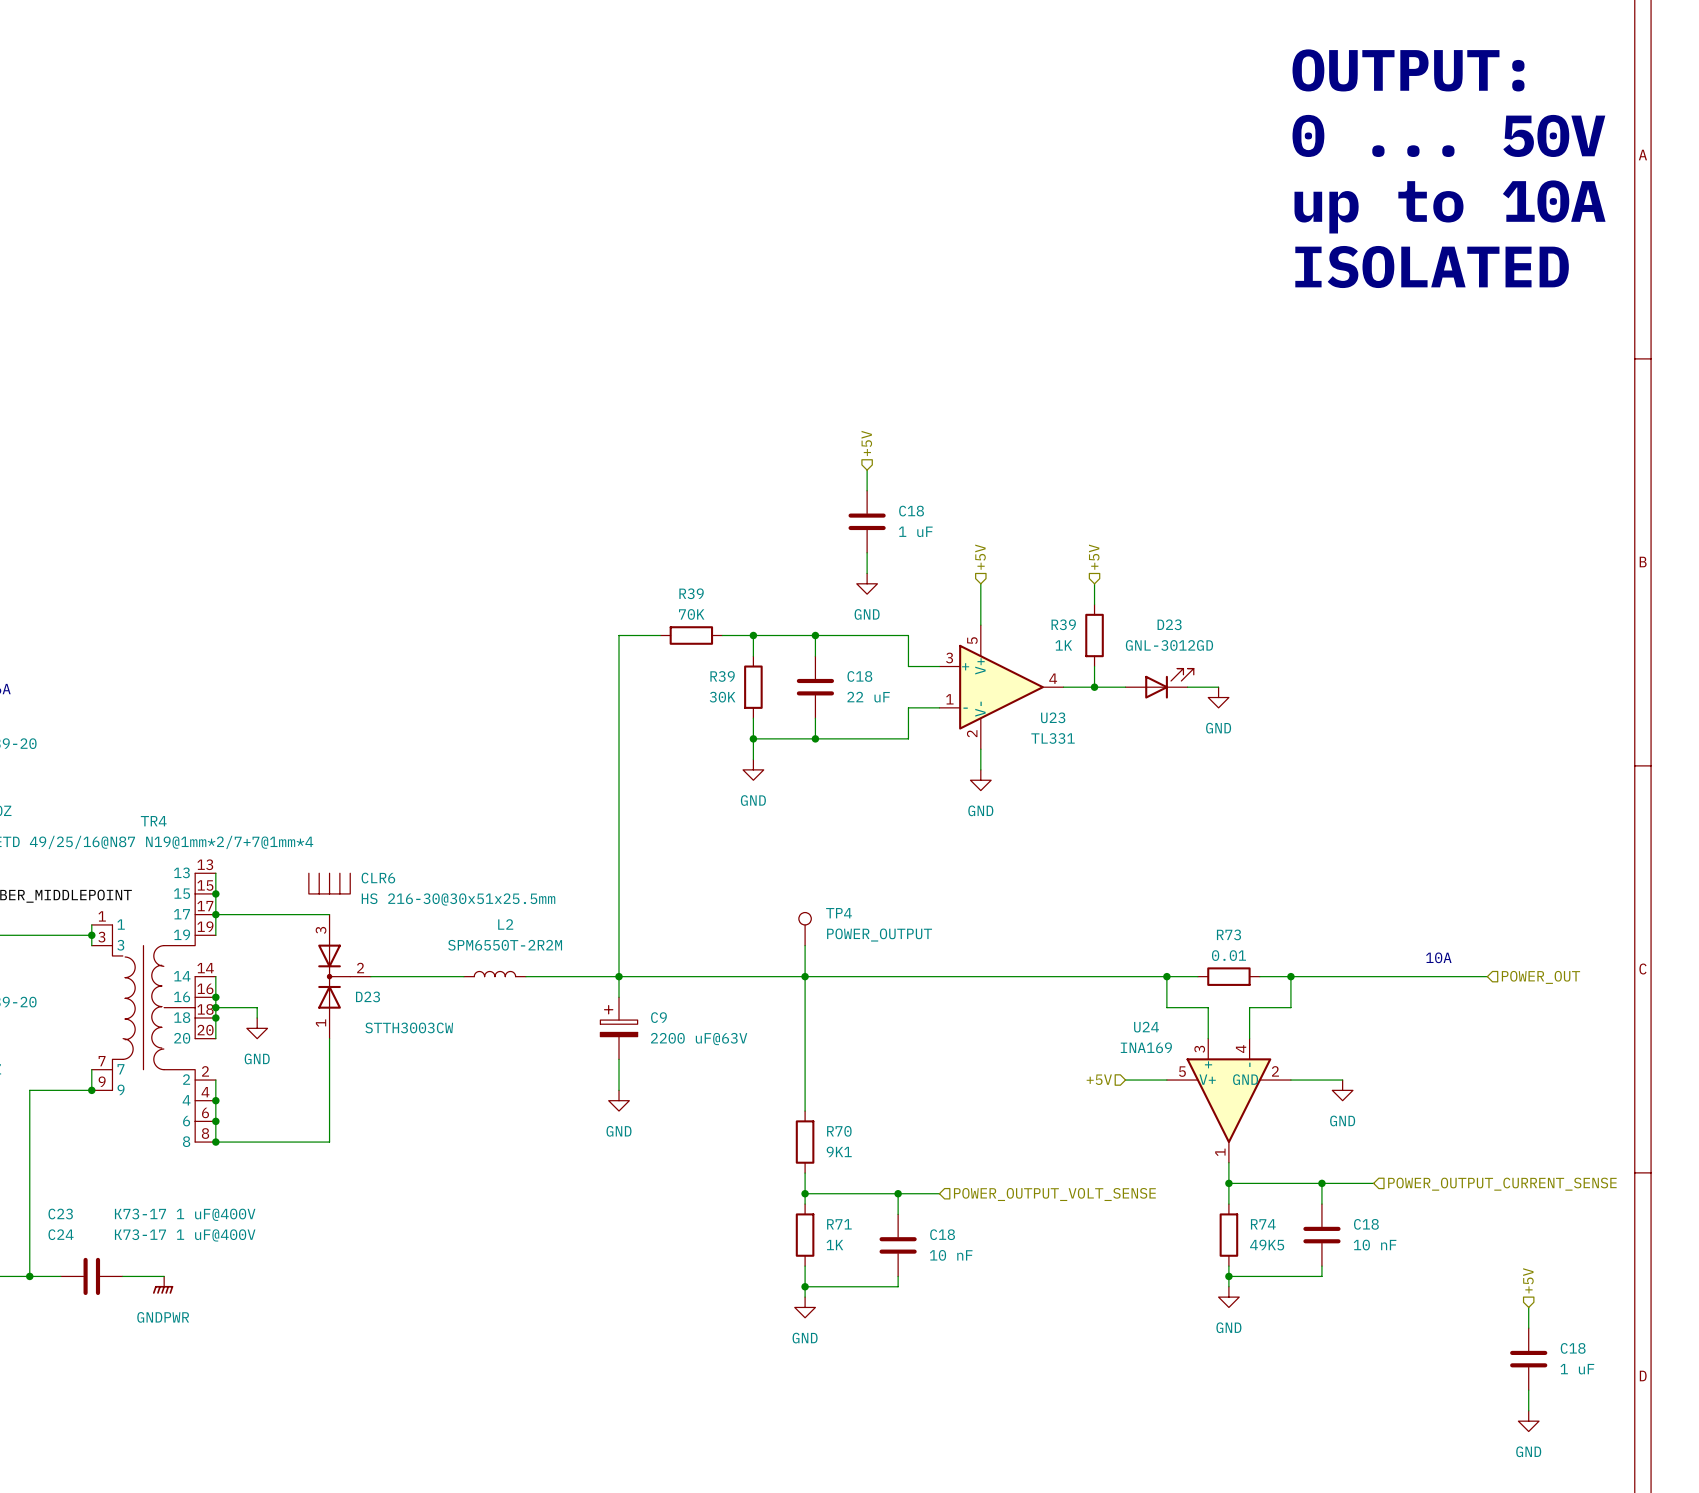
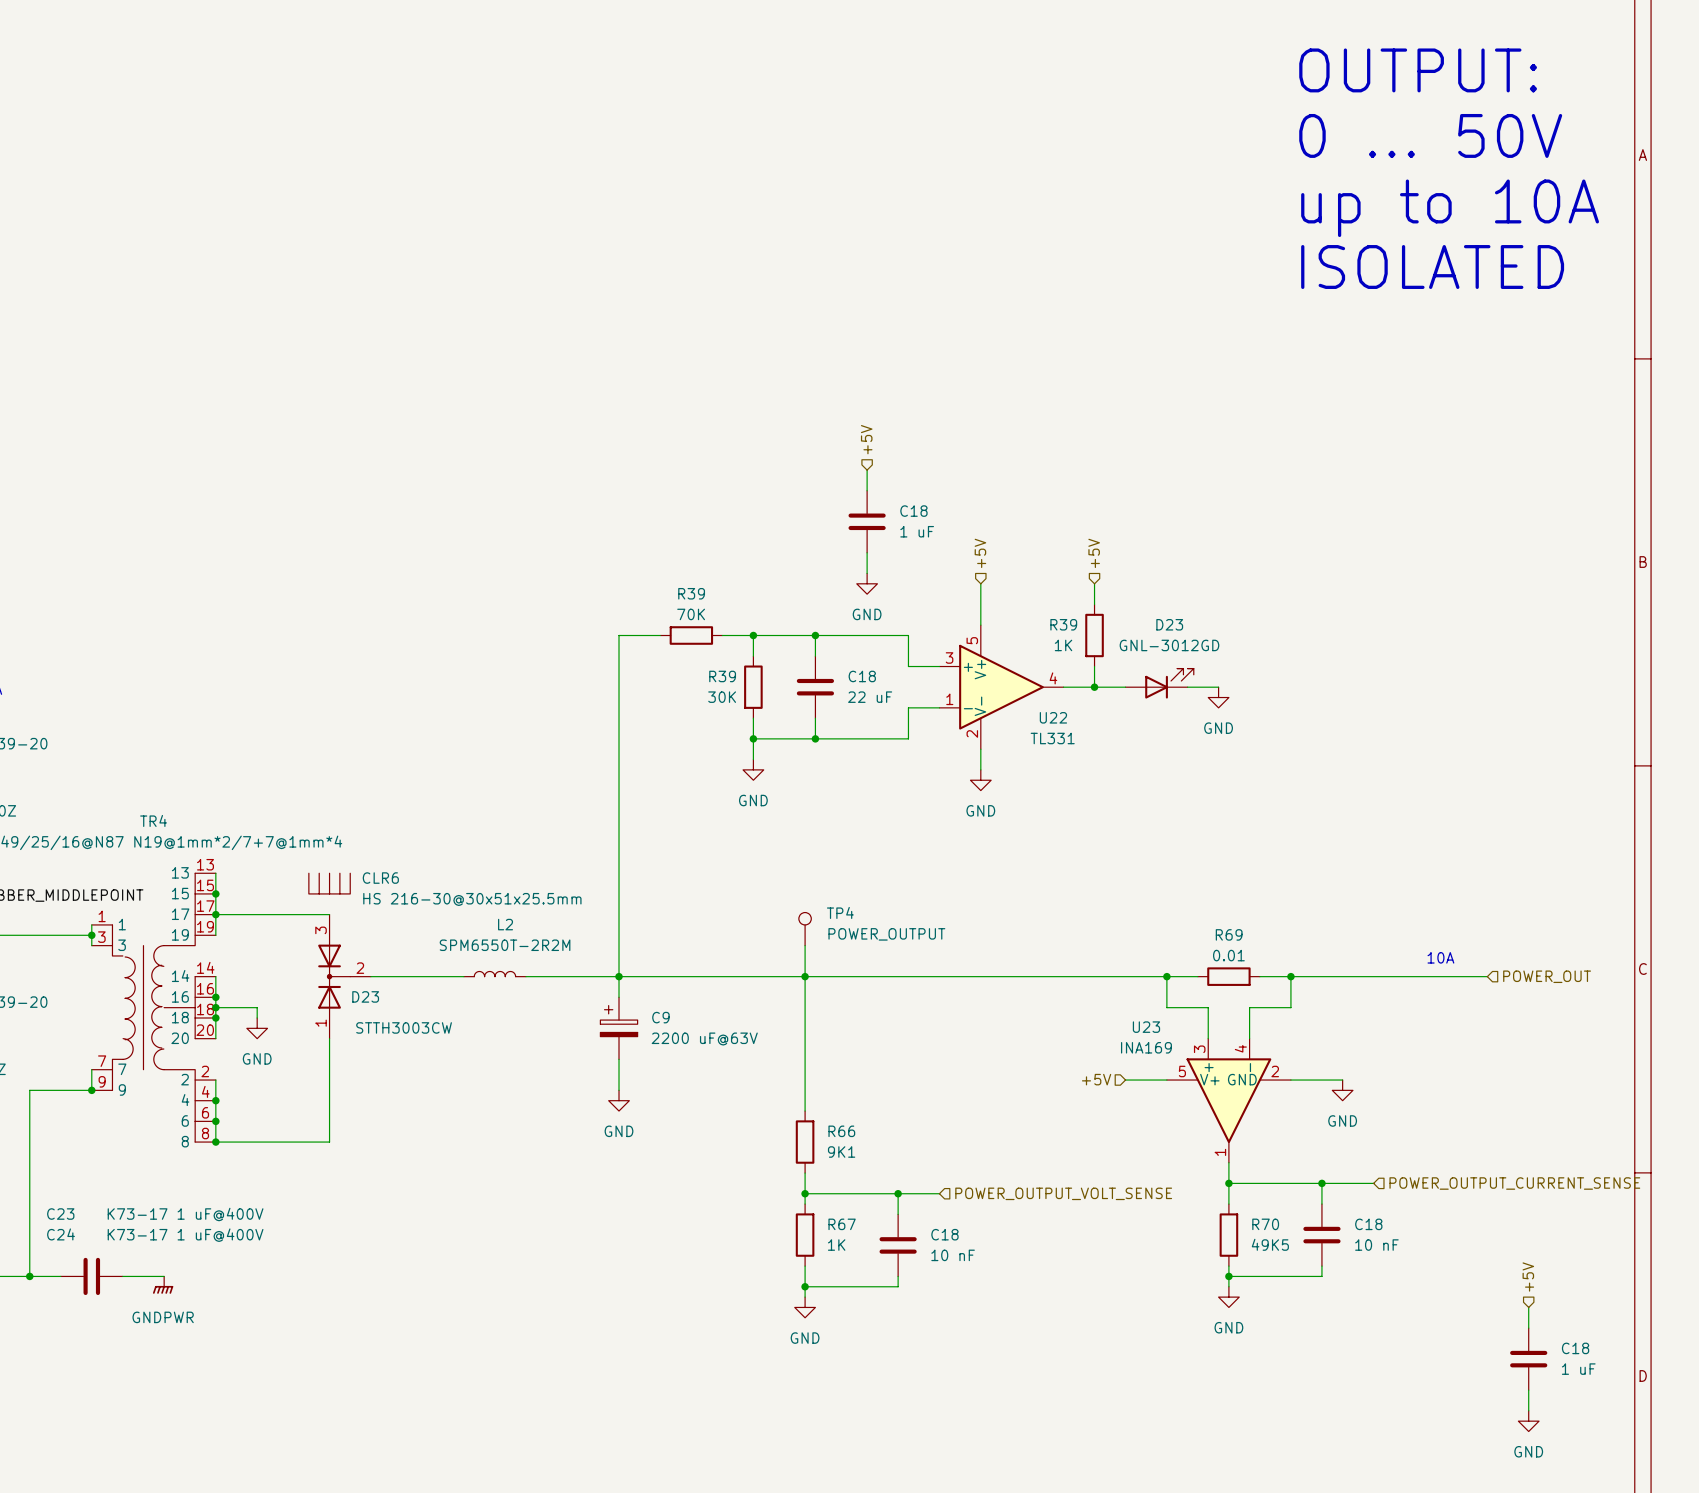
U23 name: U23 (1053, 717) -> U22 (1053, 717)
R73 name: R73 (1228, 934) -> R69 (1229, 934)
U24 name: U24 (1146, 1027) -> U23 (1146, 1027)
R70 name: R70 (839, 1131) -> R66 (841, 1131)
R71 name: R71 (839, 1224) -> R67 (842, 1224)
R74 name: R74 (1263, 1224) -> R70 (1265, 1224)

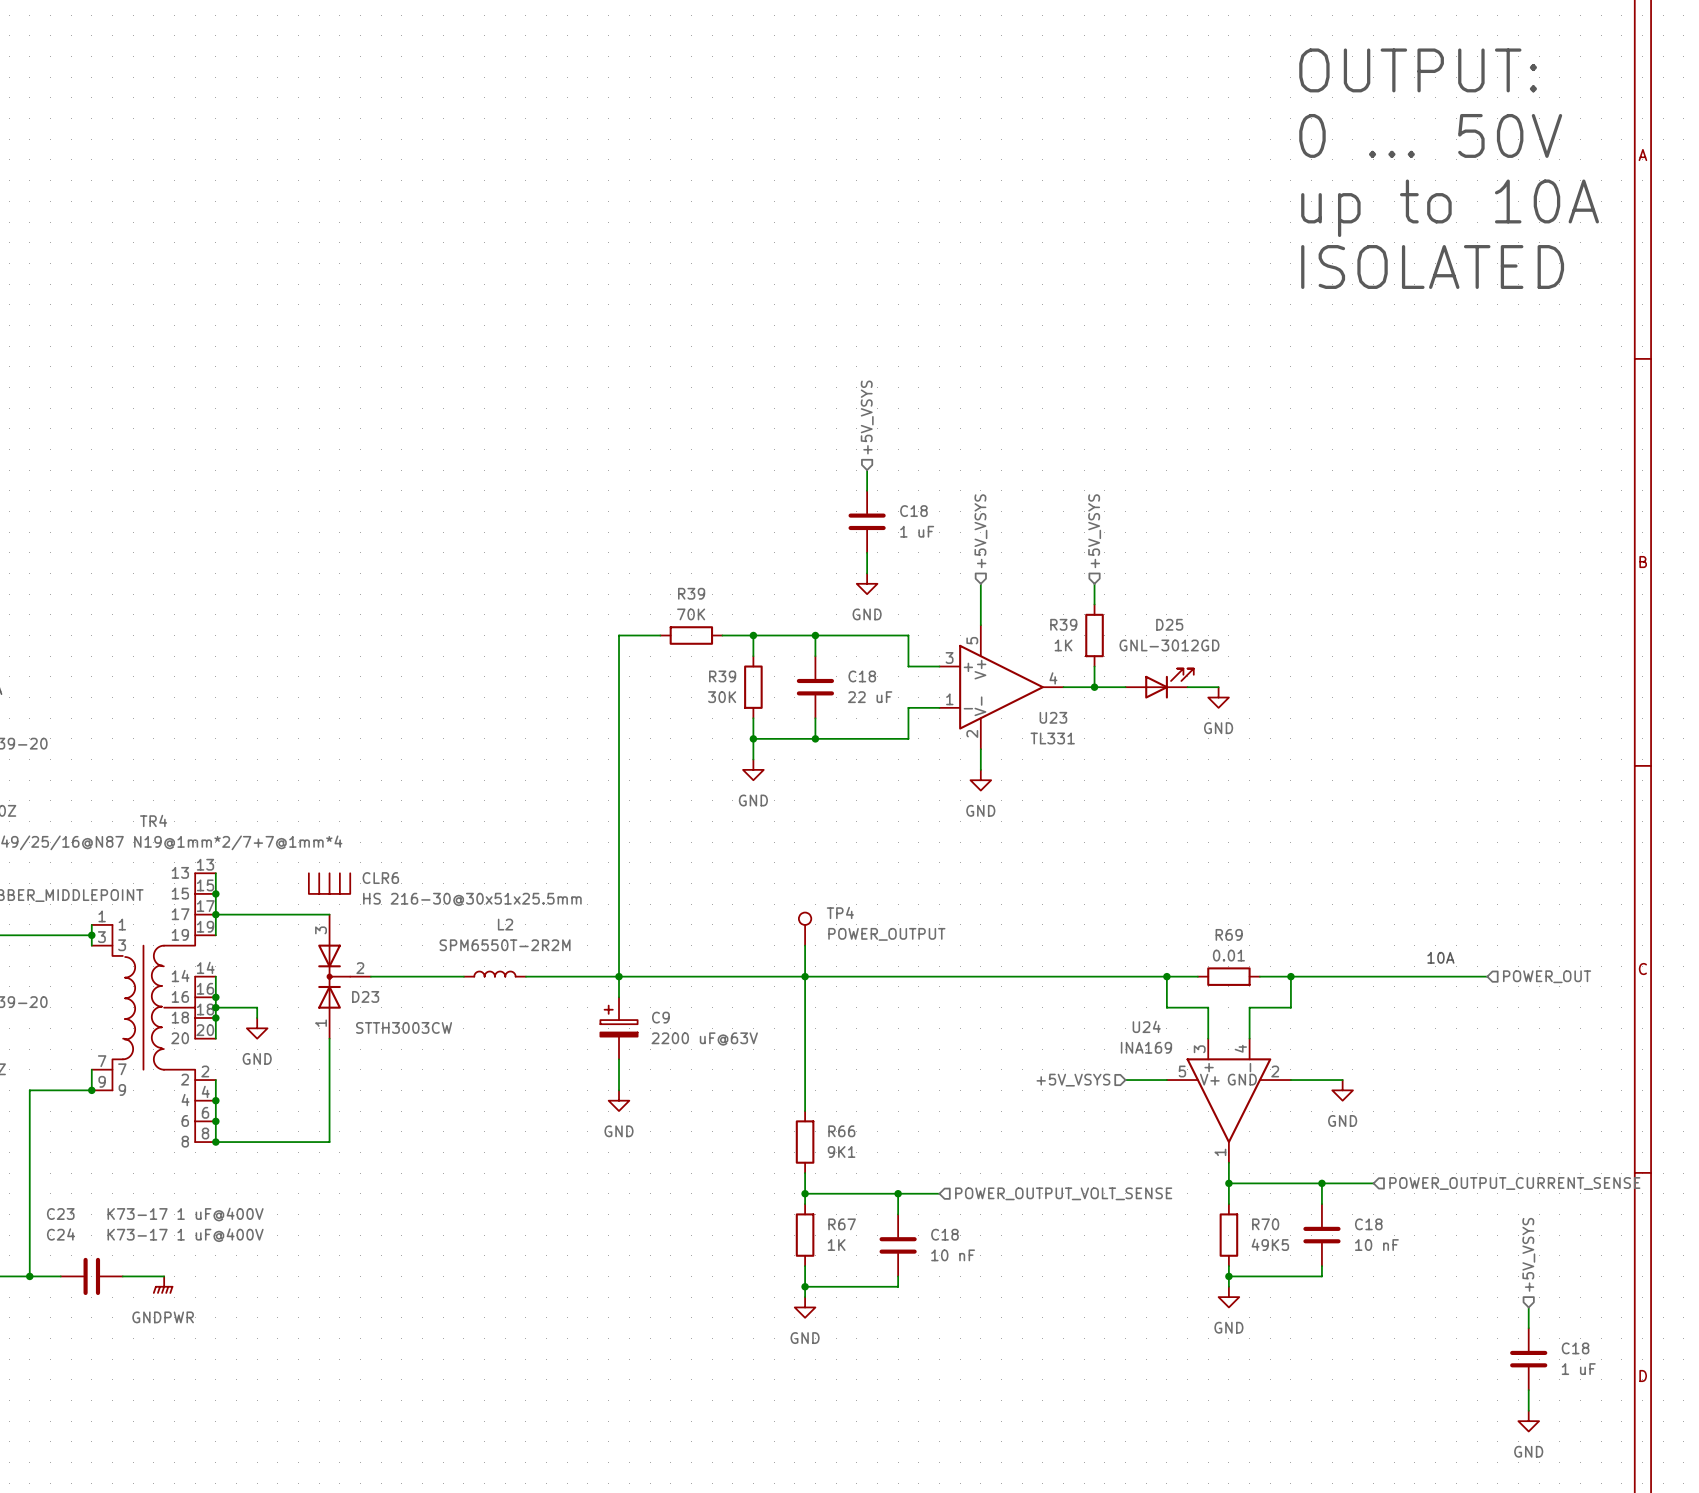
hierarchical label: +5V (866, 439) -> +5V_VSYS (867, 417)
hierarchical label: +5V (980, 553) -> +5V_VSYS (980, 531)
hierarchical label: +5V (1094, 553) -> +5V_VSYS (1094, 531)
D23 name: D23 (1169, 624) -> D25 (1169, 624)
U22 name: U22 (1053, 717) -> U23 (1053, 717)
U23 name: U23 (1146, 1027) -> U24 (1146, 1026)
hierarchical label: +5V (1096, 1079) -> +5V_VSYS (1073, 1080)
hierarchical label: +5V (1528, 1277) -> +5V_VSYS (1528, 1254)

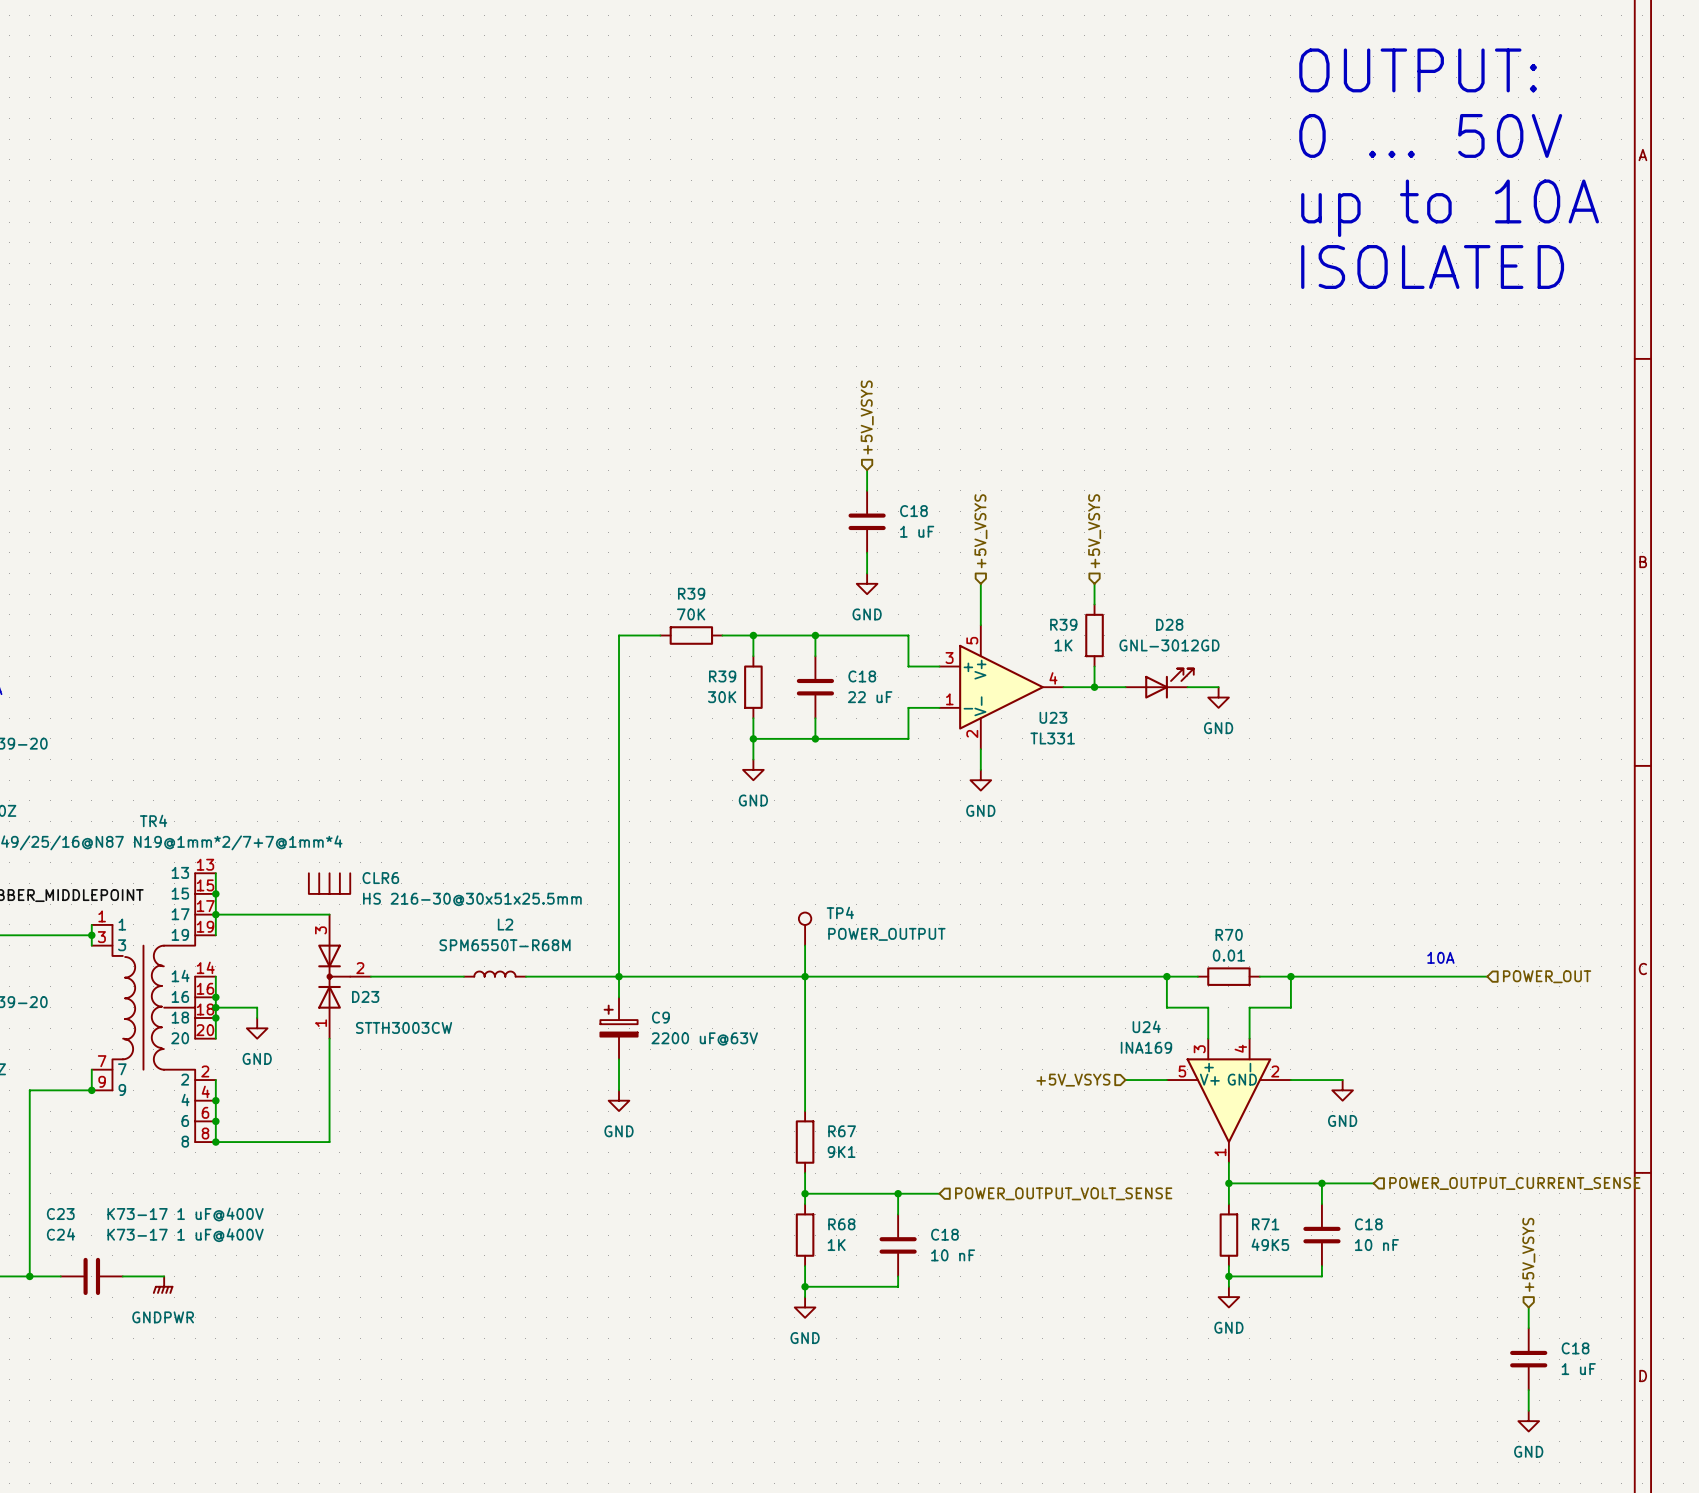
D25 name: D25 (1169, 624) -> D28 (1169, 624)
R69 name: R69 (1229, 934) -> R70 (1229, 934)
L2 value: SPM6550T-2R2M (505, 945) -> SPM6550T-R68M (505, 945)
R66 name: R66 (841, 1131) -> R67 (842, 1131)
R67 name: R67 (842, 1224) -> R68 (841, 1224)
R70 name: R70 (1265, 1224) -> R71 (1265, 1224)

